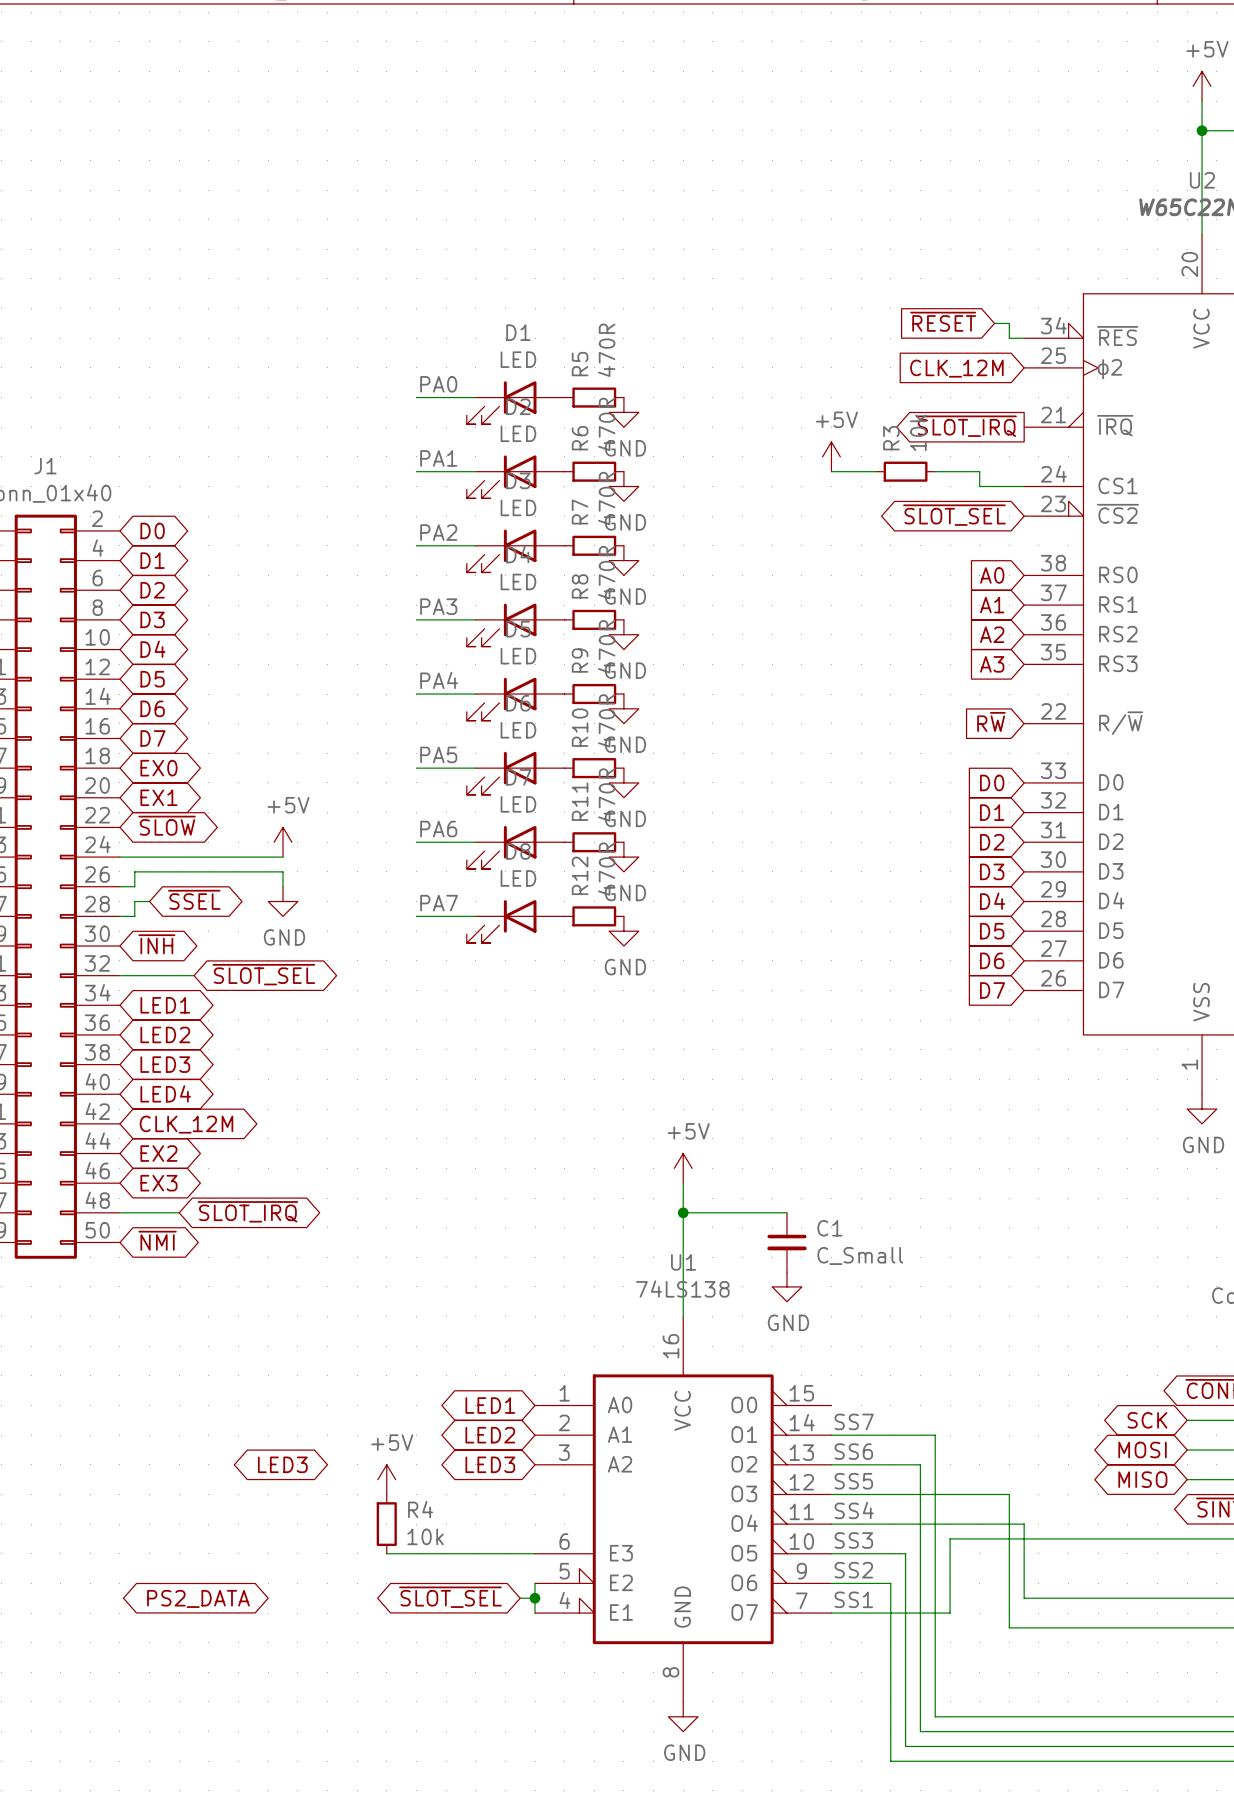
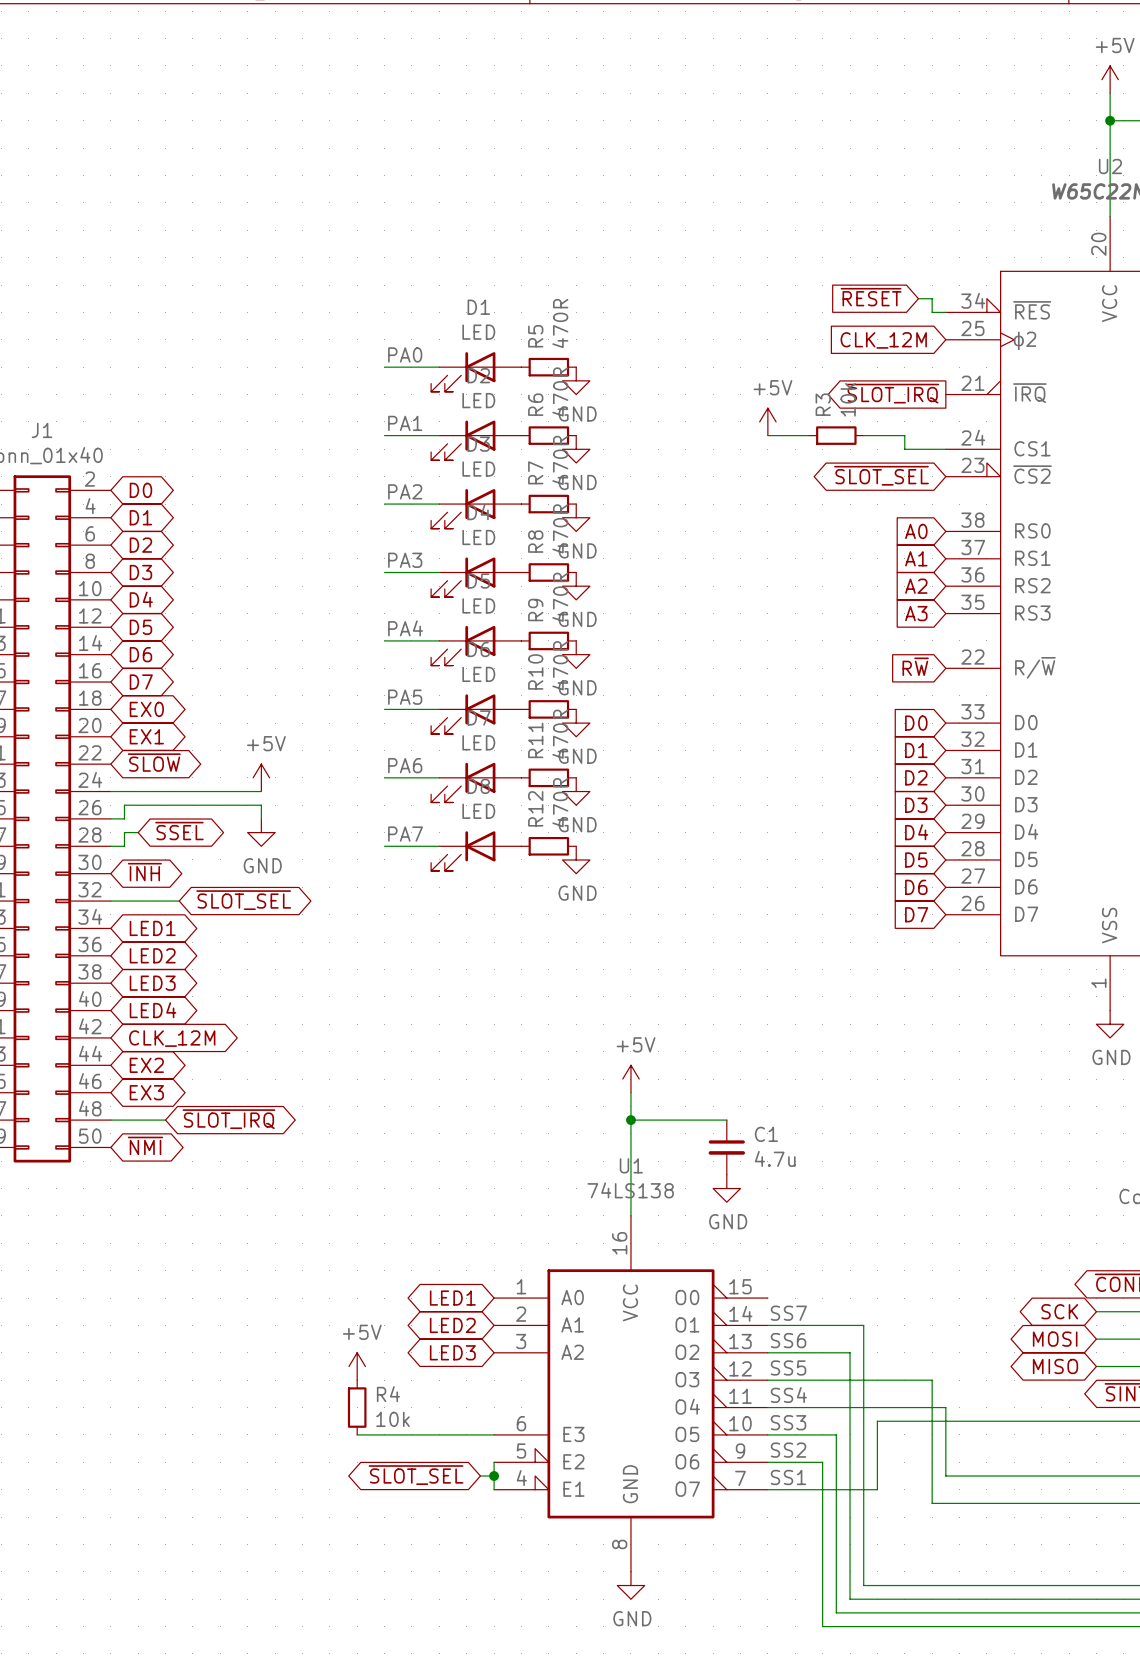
C1 value: C_Small (860, 1255) -> 4.7u (775, 1158)
global label: LED3 (282, 1464) -> none
global label: PS2_DATA (198, 1598) -> none

